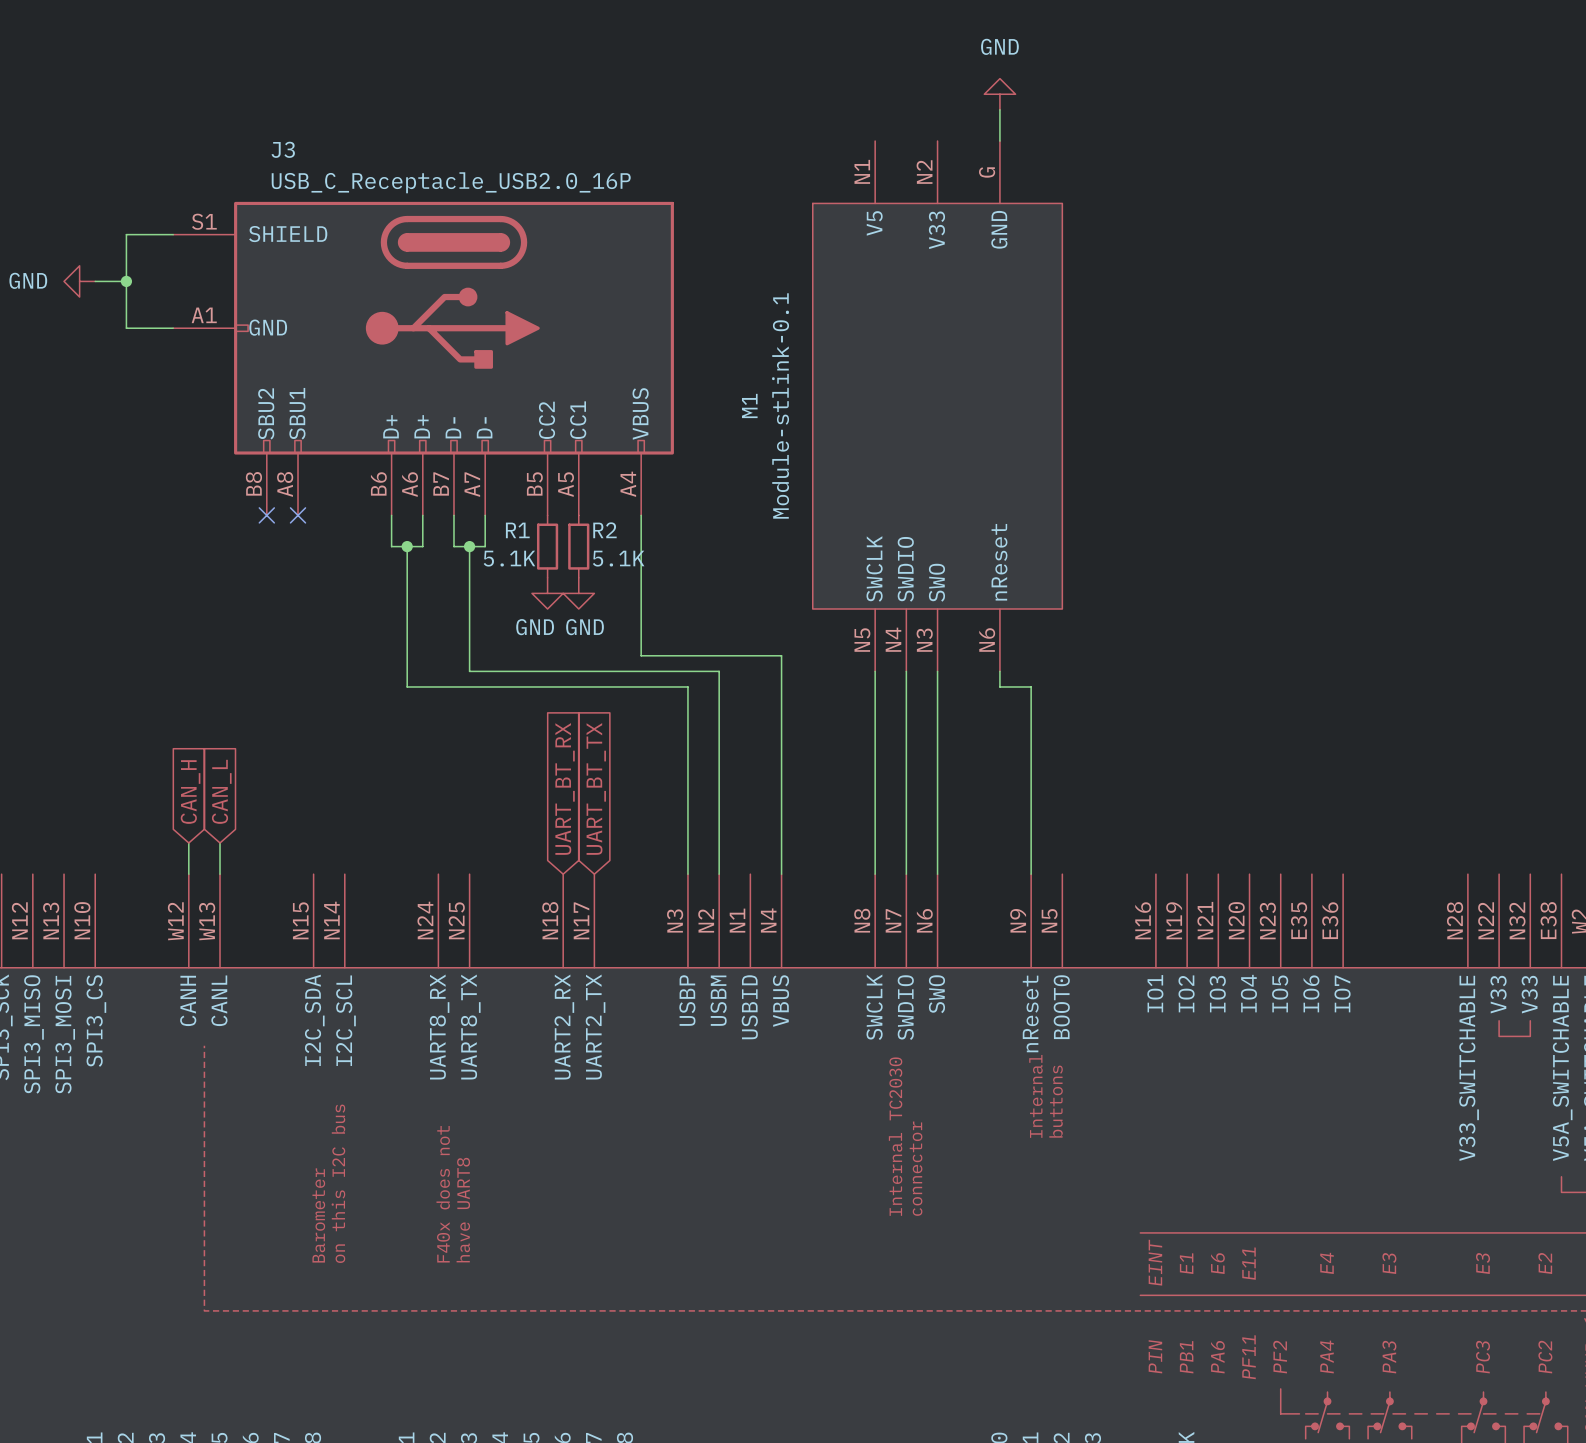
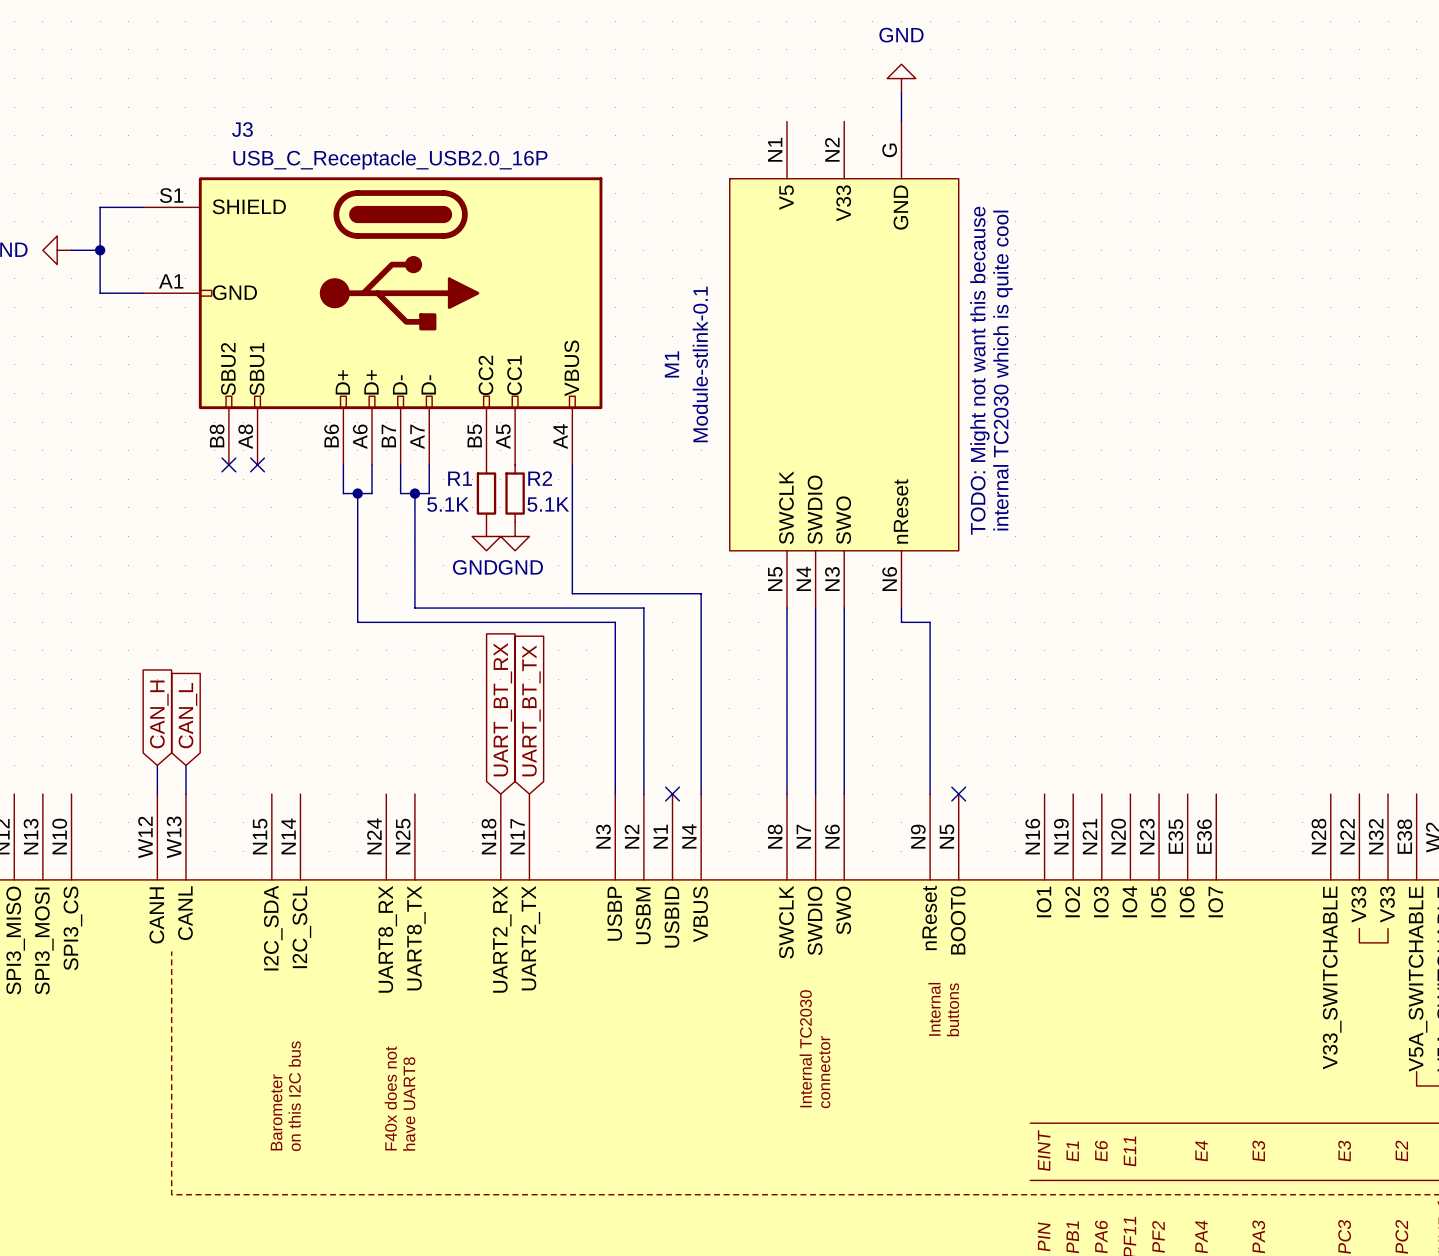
text: none -> TODO: Might not want this because (979, 370)
text: none -> internal TC2030 which is quite cool (1002, 370)
no-connect mark: none -> (672, 794)
no-connect mark: none -> (958, 794)

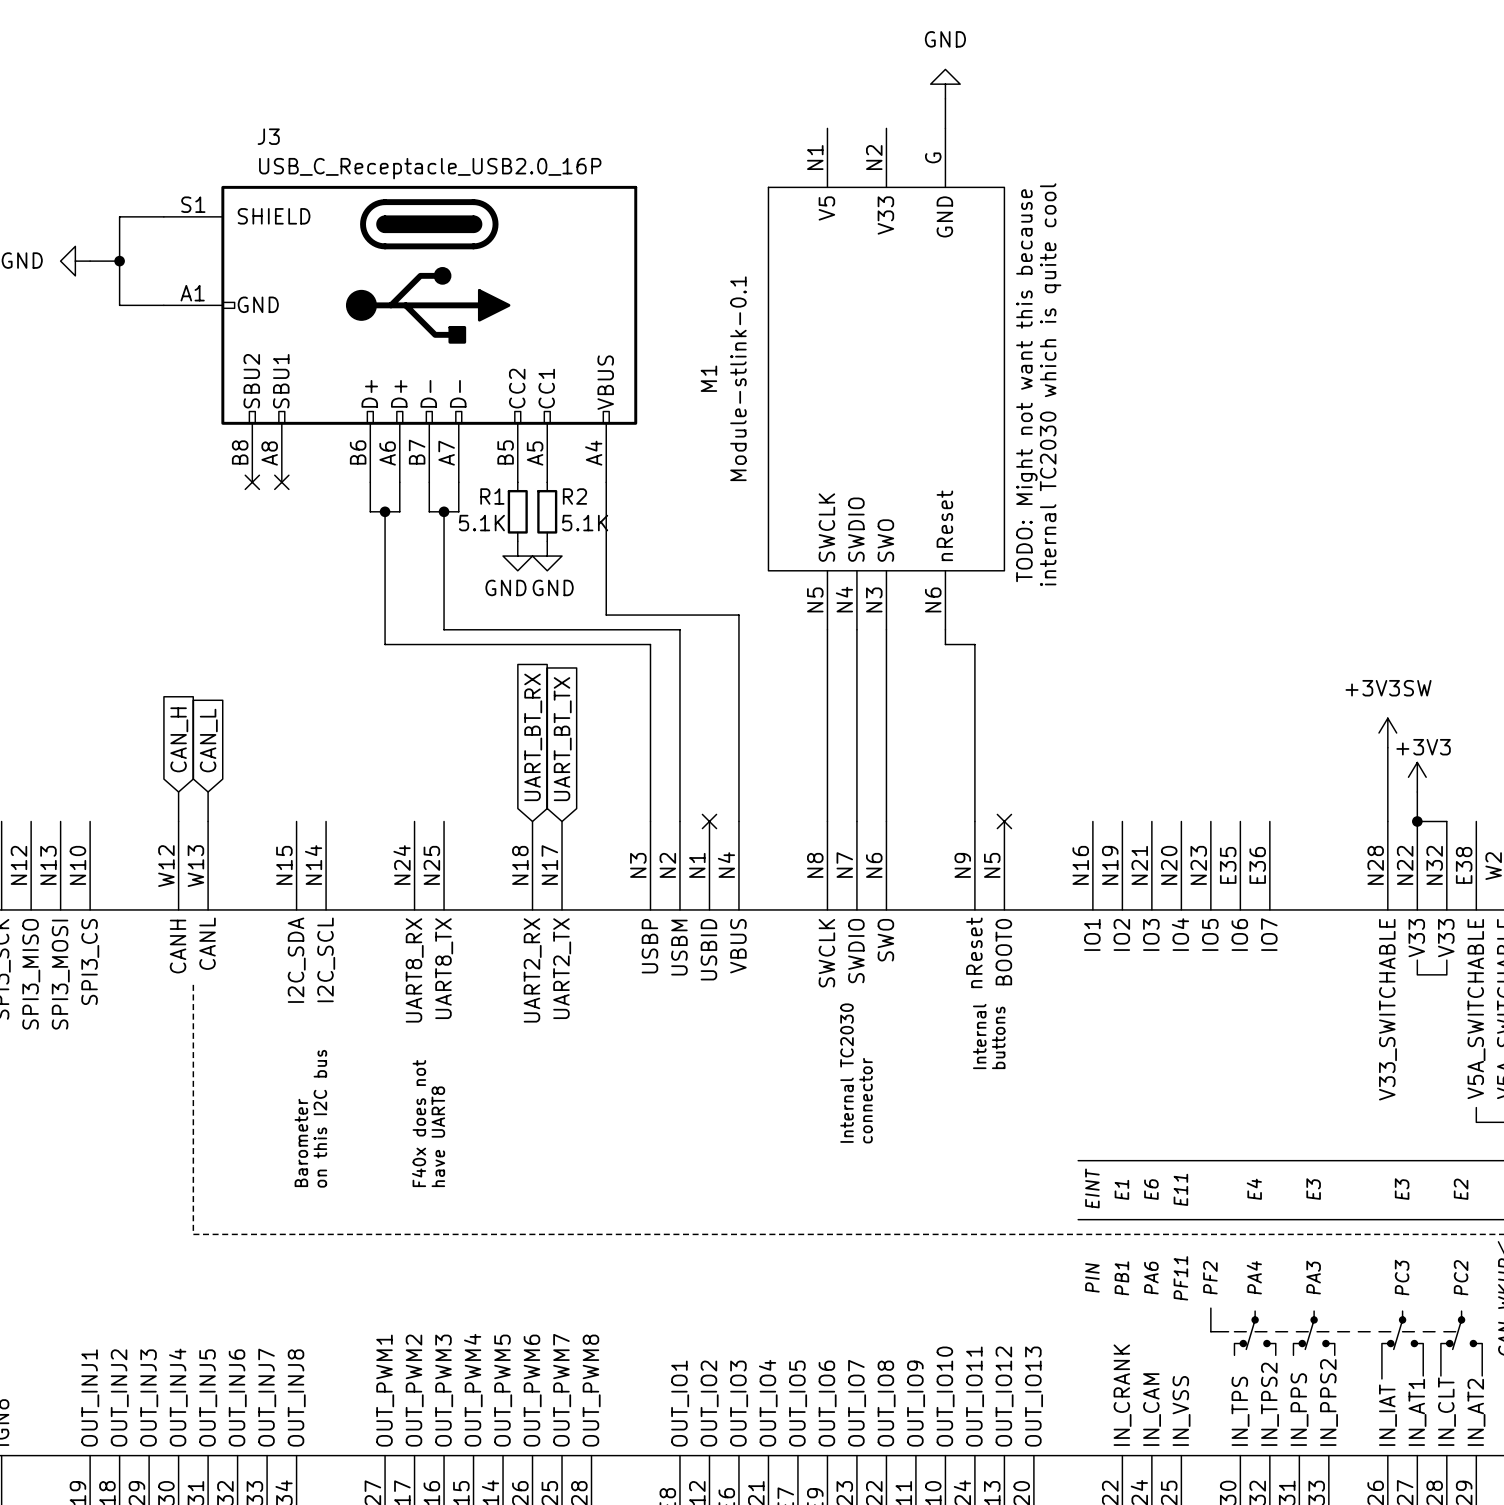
power symbol: none -> +3V3SW (1387, 733)
wire: none -> (1387, 747) (1387, 821)
power symbol: none -> +3V3 (1417, 777)
wire: none -> (1417, 792) (1417, 821) (1446, 821)
junction: none -> (1417, 821)

